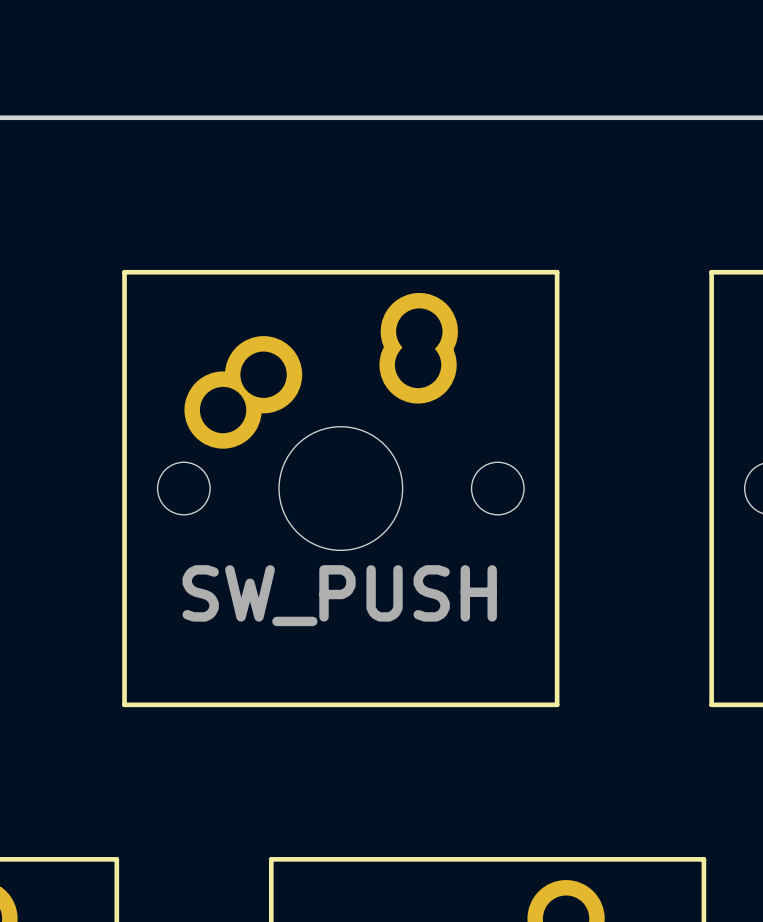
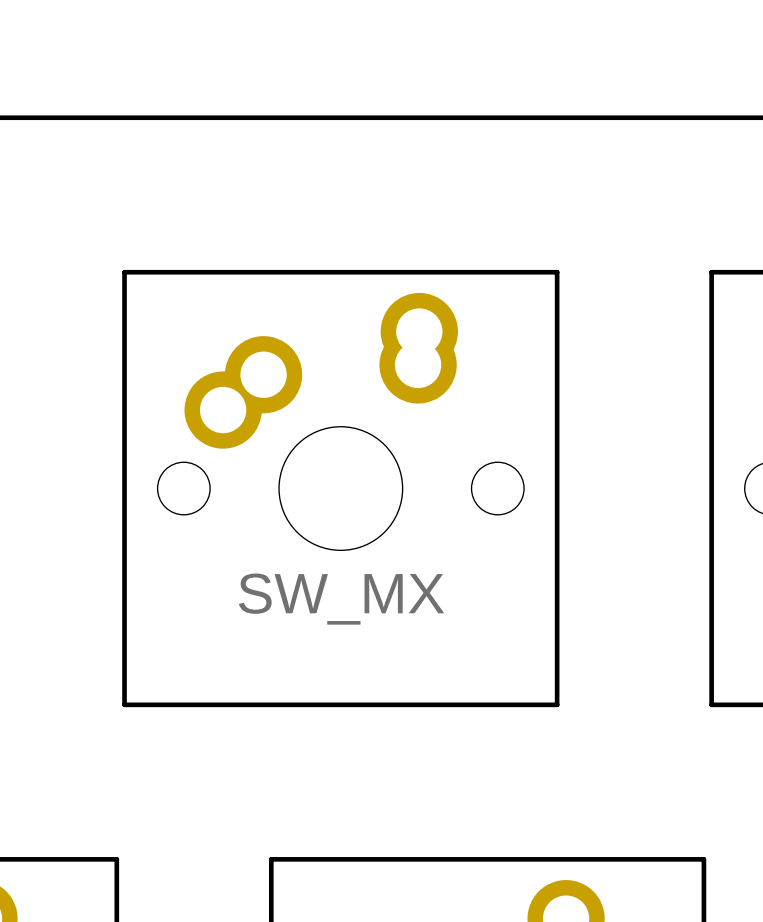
part value: SW_PUSH (339, 595) -> SW_MX (341, 599)

